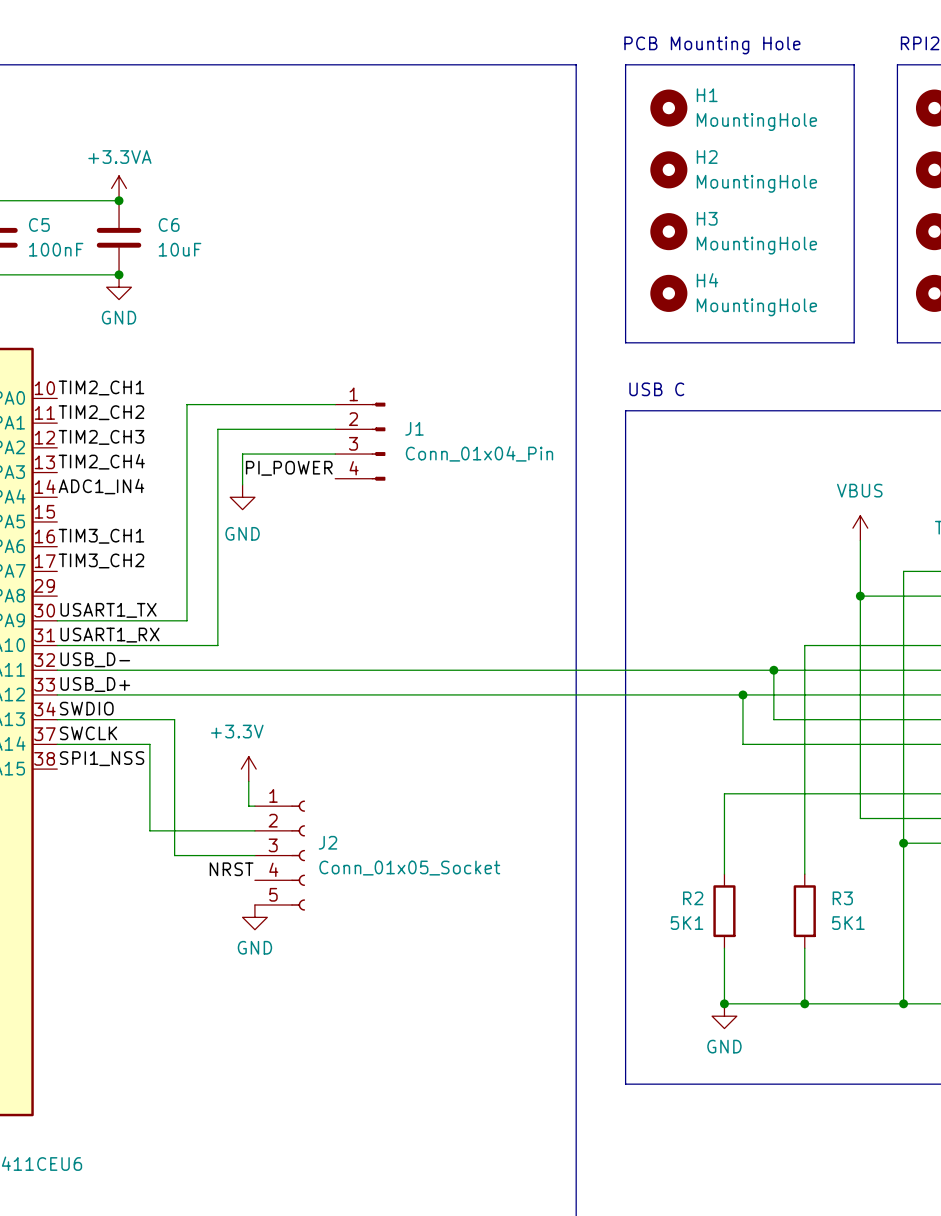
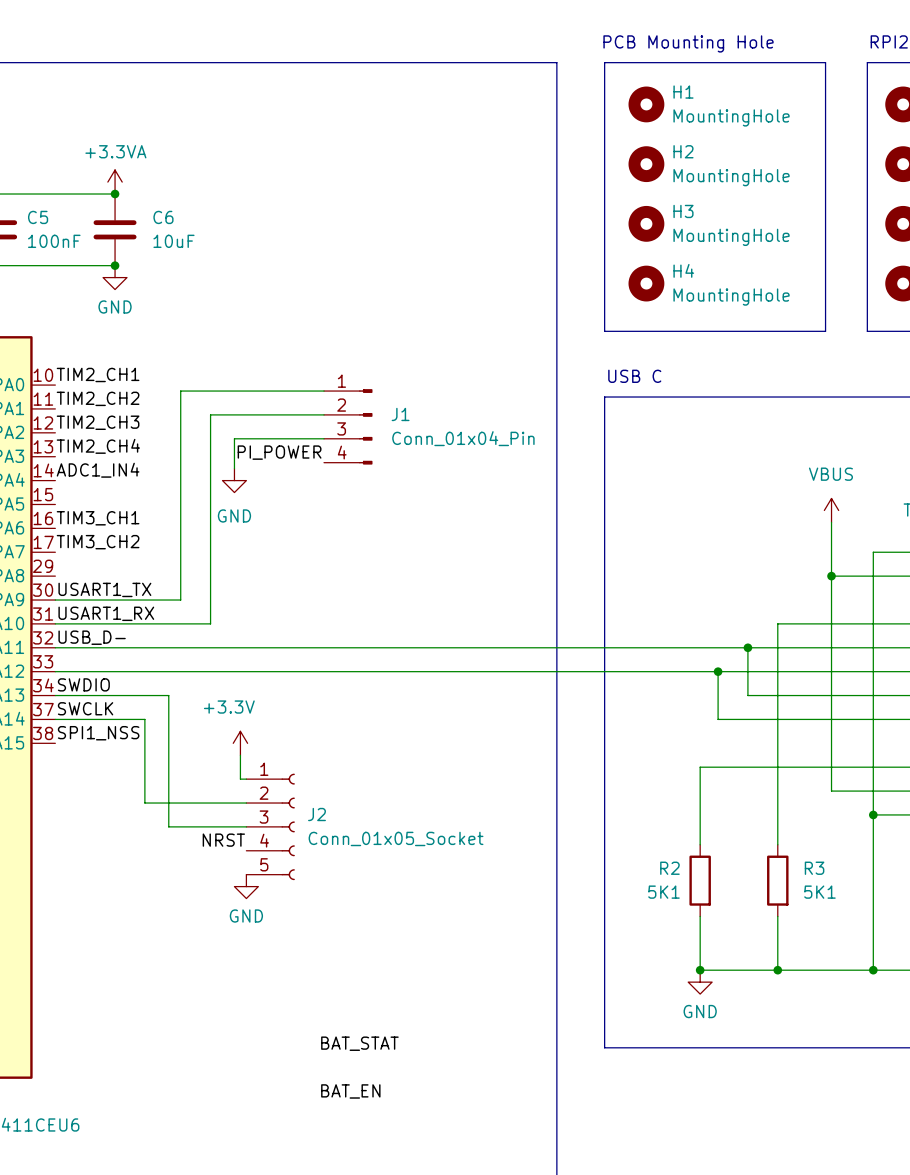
label: USB_D+ (95, 684) -> none
label: none -> BAT_STAT (359, 1043)
label: none -> BAT_EN (350, 1091)

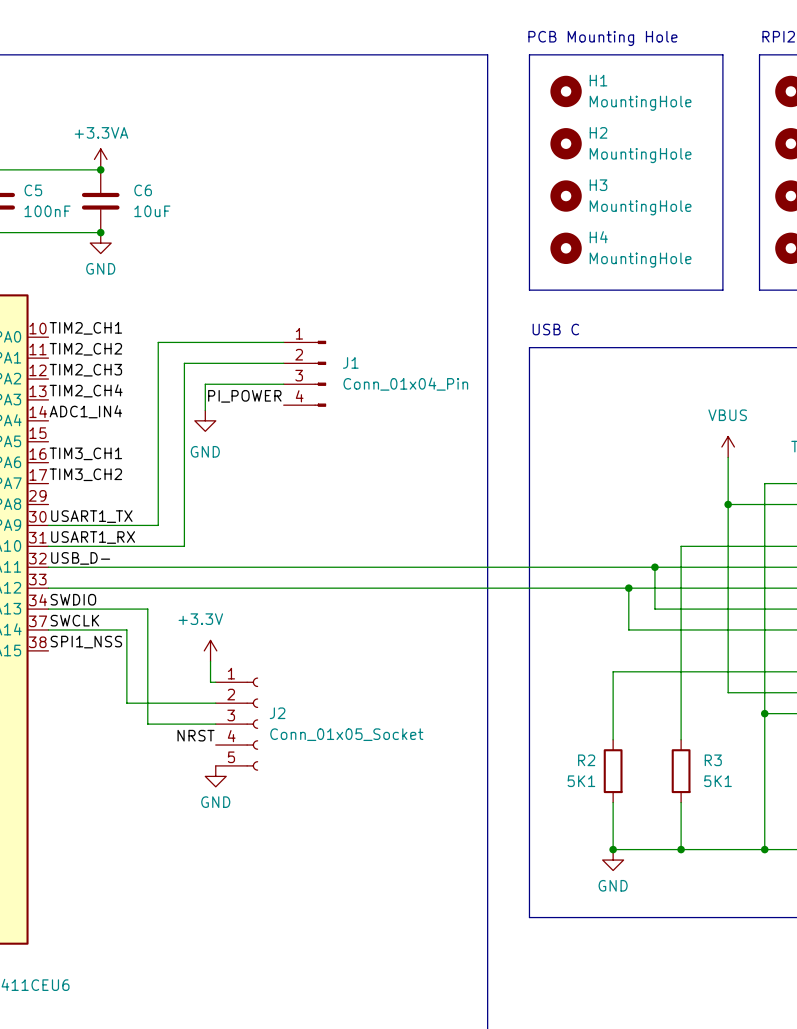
label: BAT_STAT (359, 1043) -> none
label: BAT_EN (350, 1091) -> none

